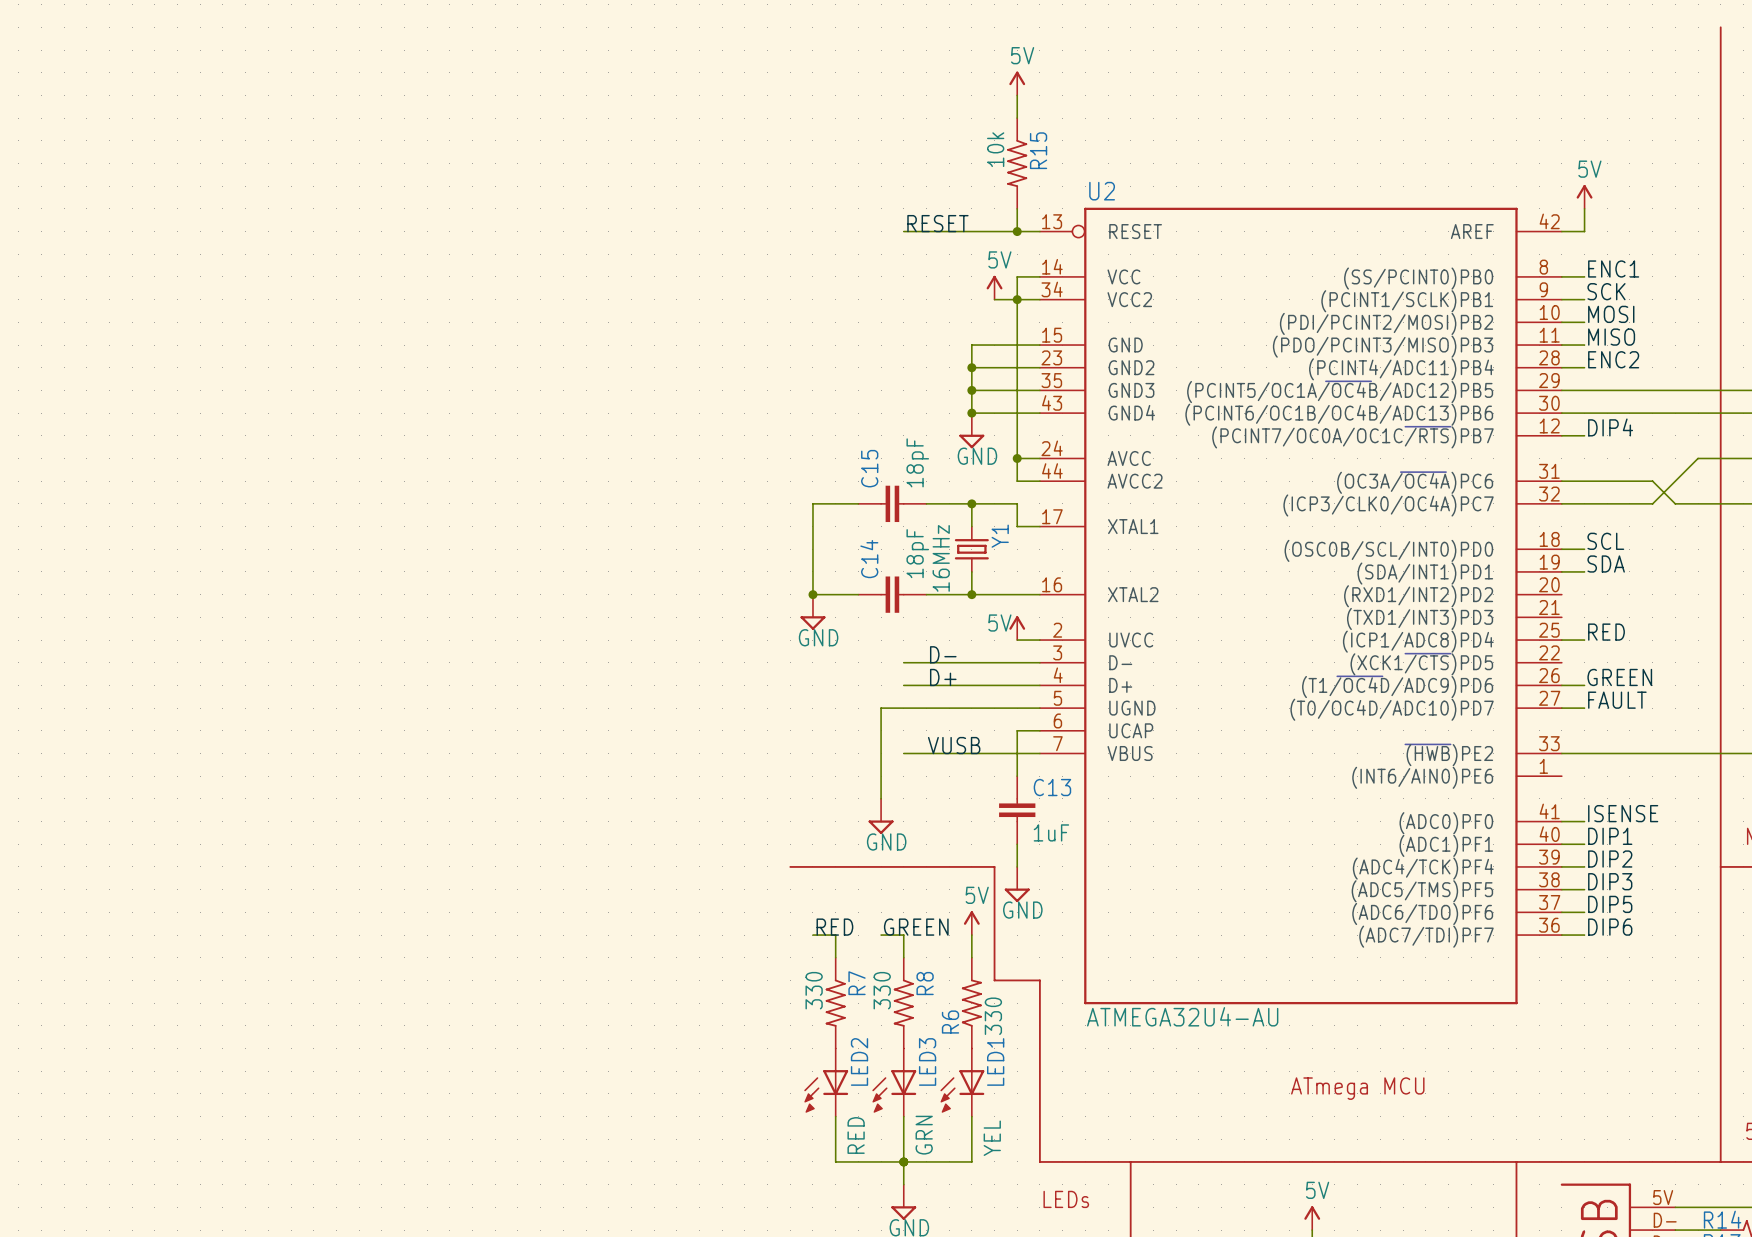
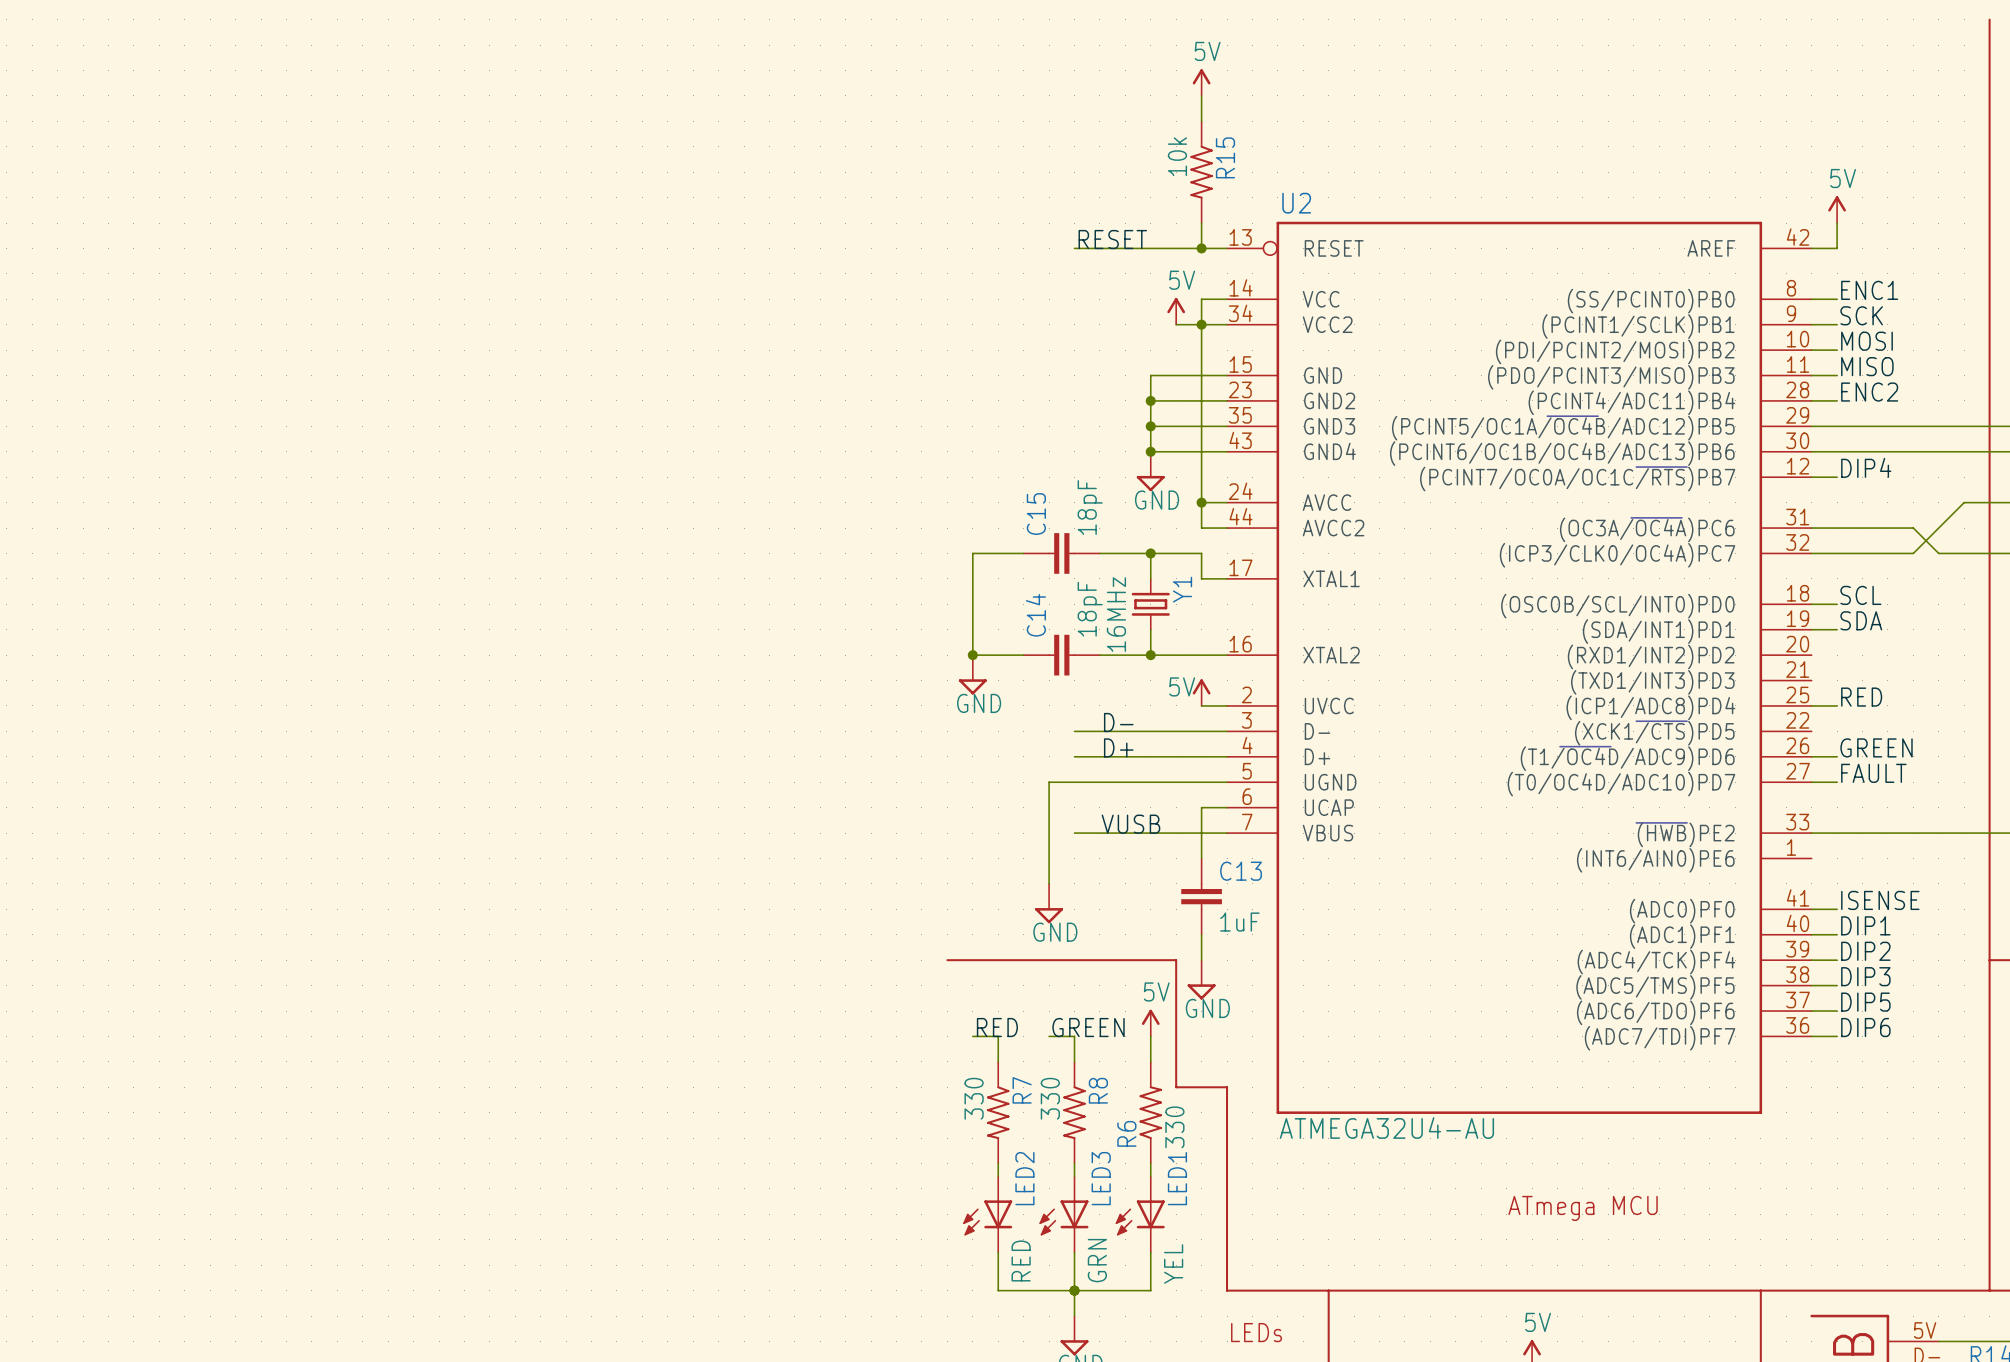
LED2 symbol: [804, 1048, 849, 1117] -> [963, 1176, 1013, 1253]
LED3 symbol: [872, 1048, 917, 1117] -> [1039, 1176, 1089, 1253]
LED1 symbol: [940, 1048, 985, 1117] -> [1115, 1176, 1165, 1253]

